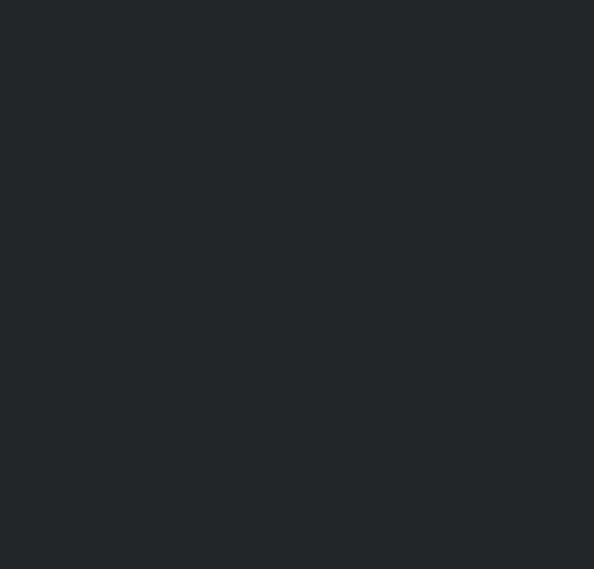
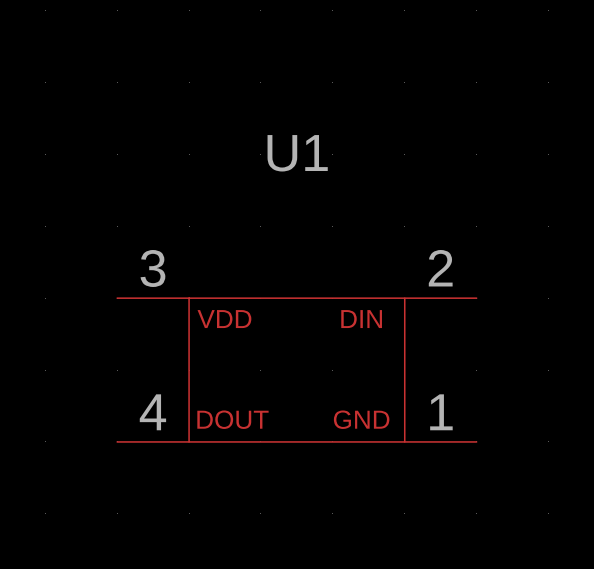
U1: none -> (296, 370)

